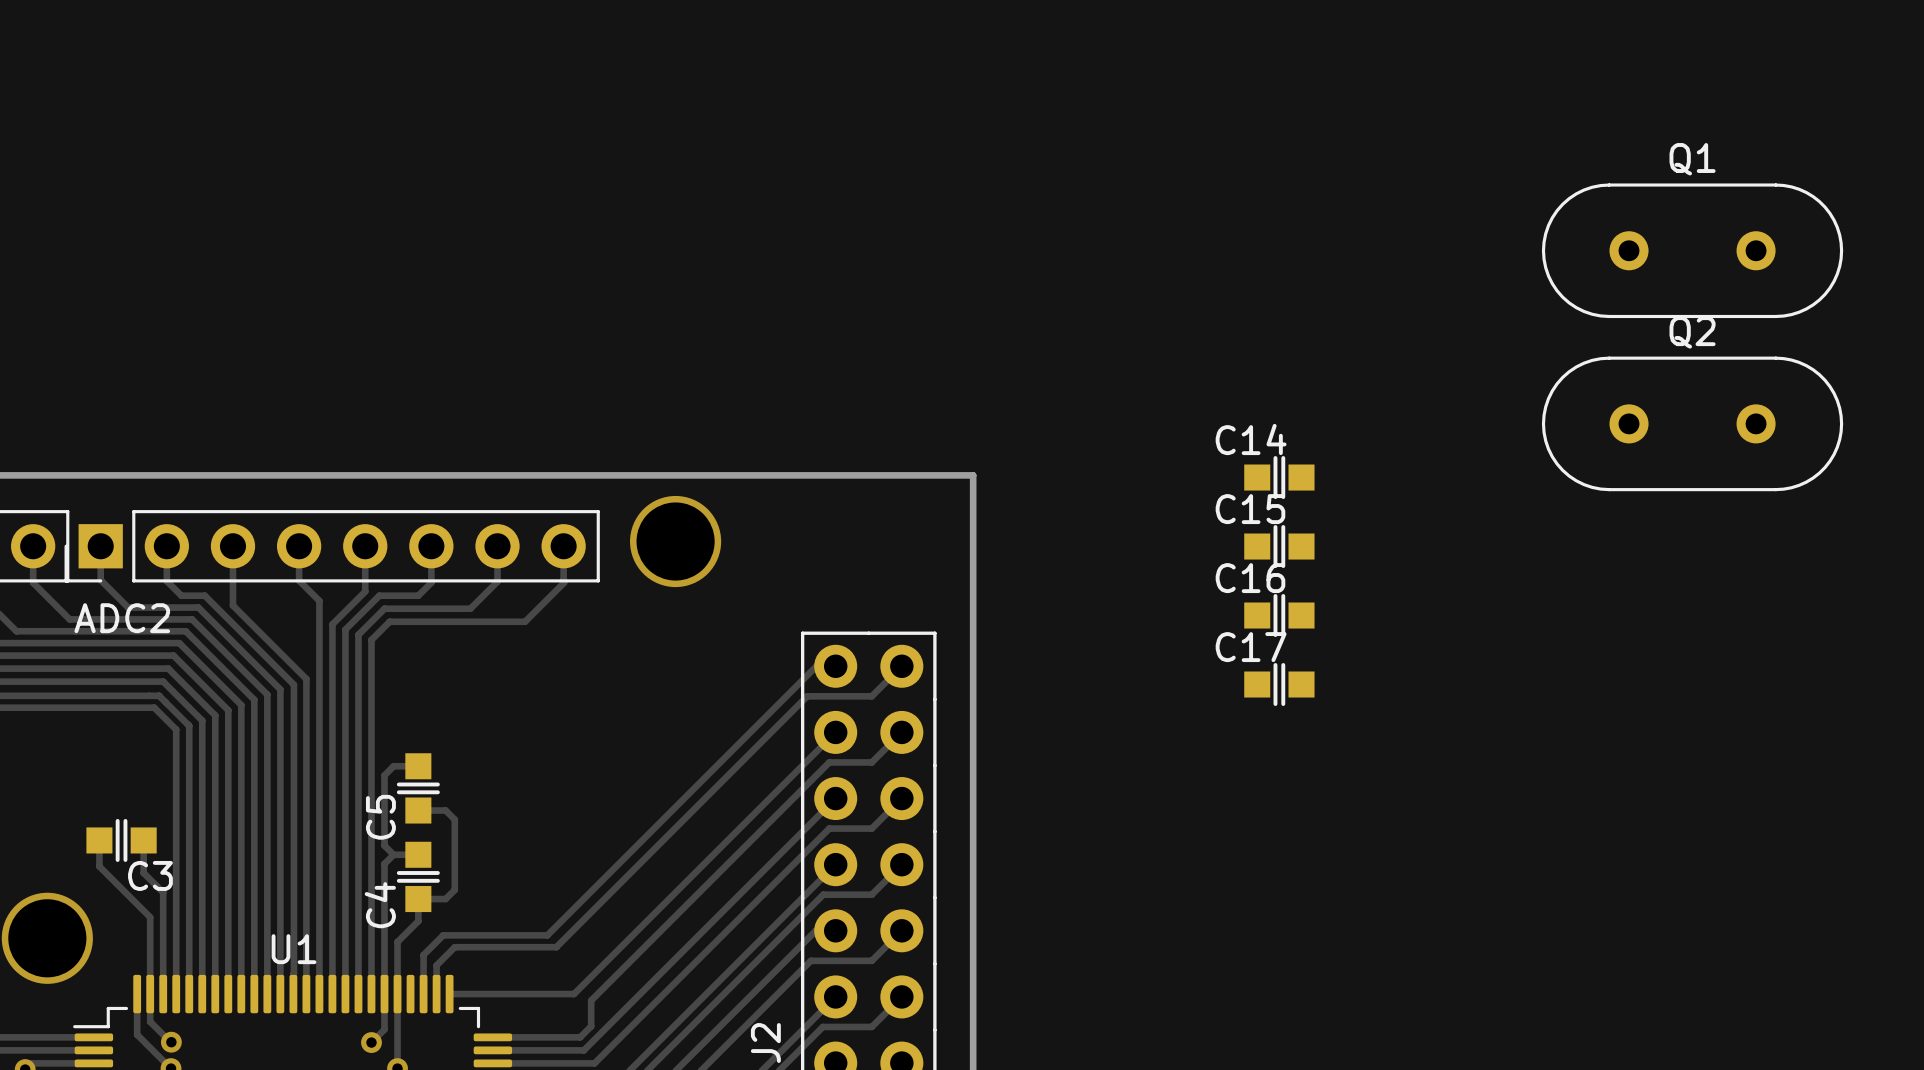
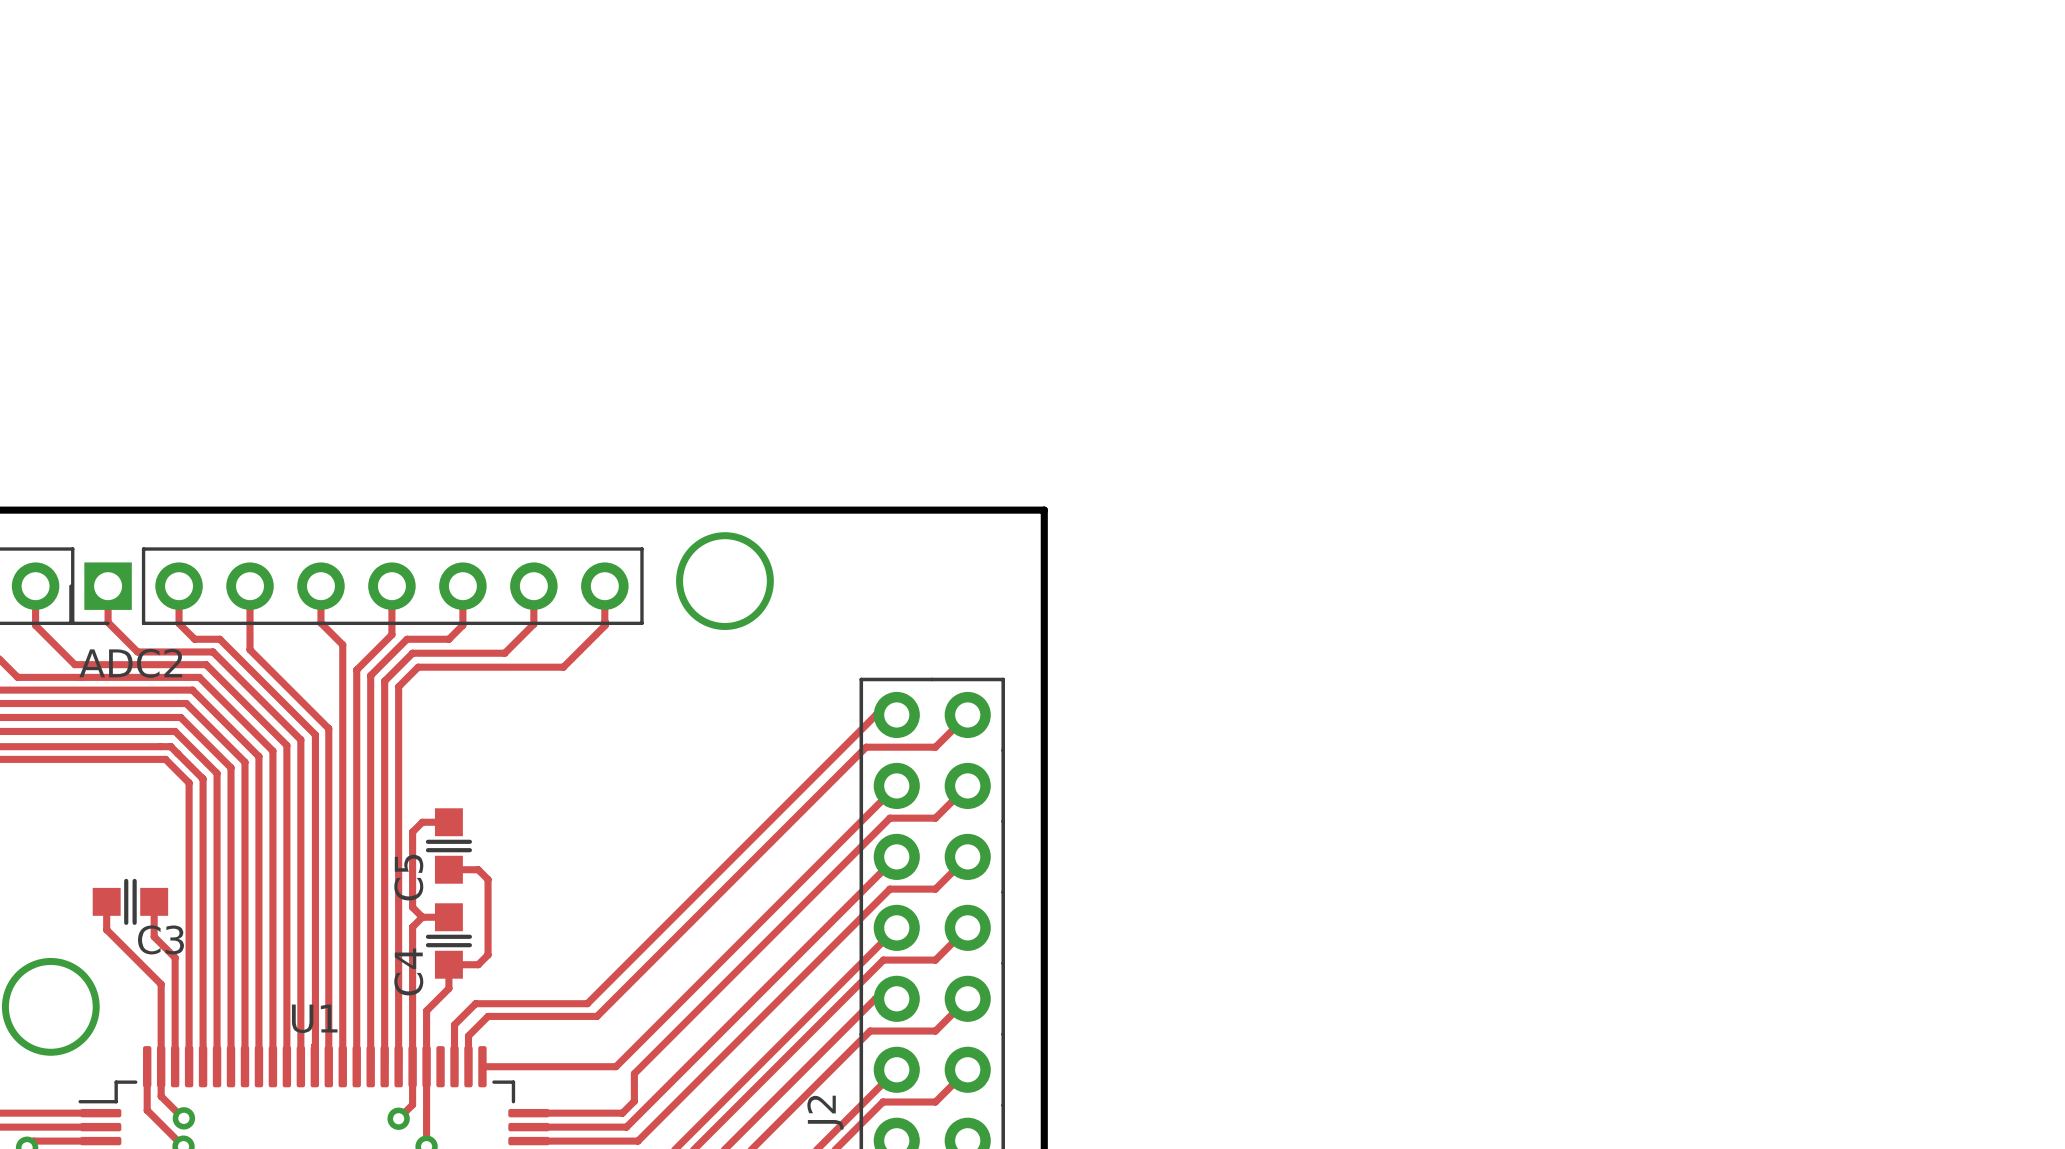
Q1: (1692, 250) -> none
Q2: (1692, 423) -> none
C14: (1279, 477) -> none
C15: (1279, 546) -> none
C16: (1279, 615) -> none
C17: (1279, 684) -> none

